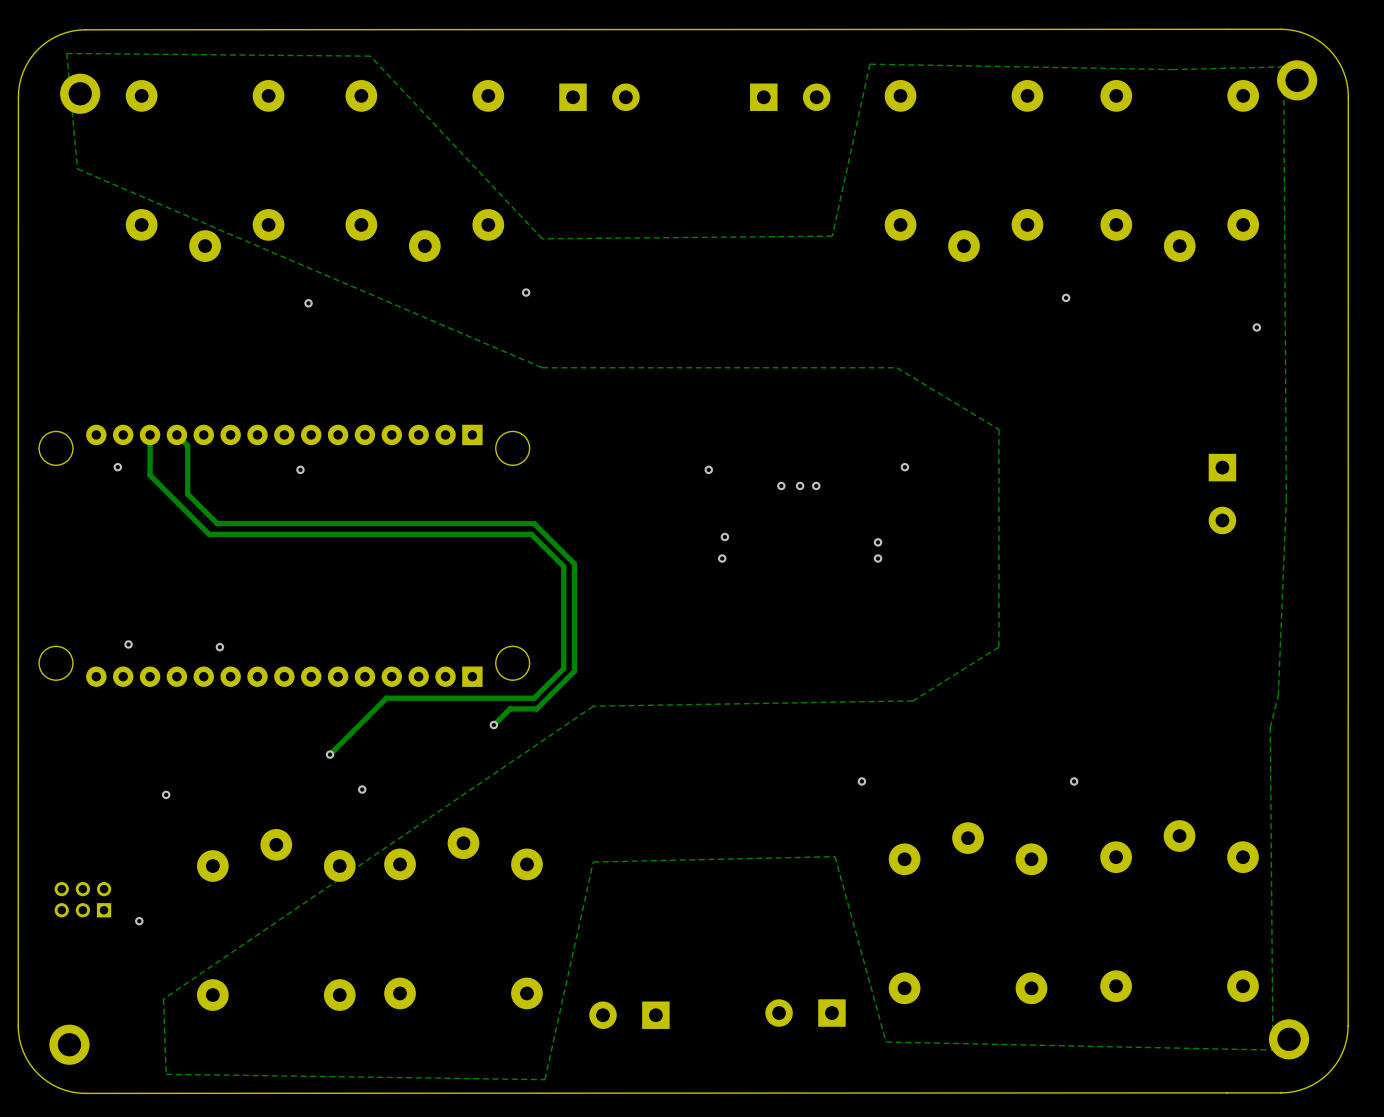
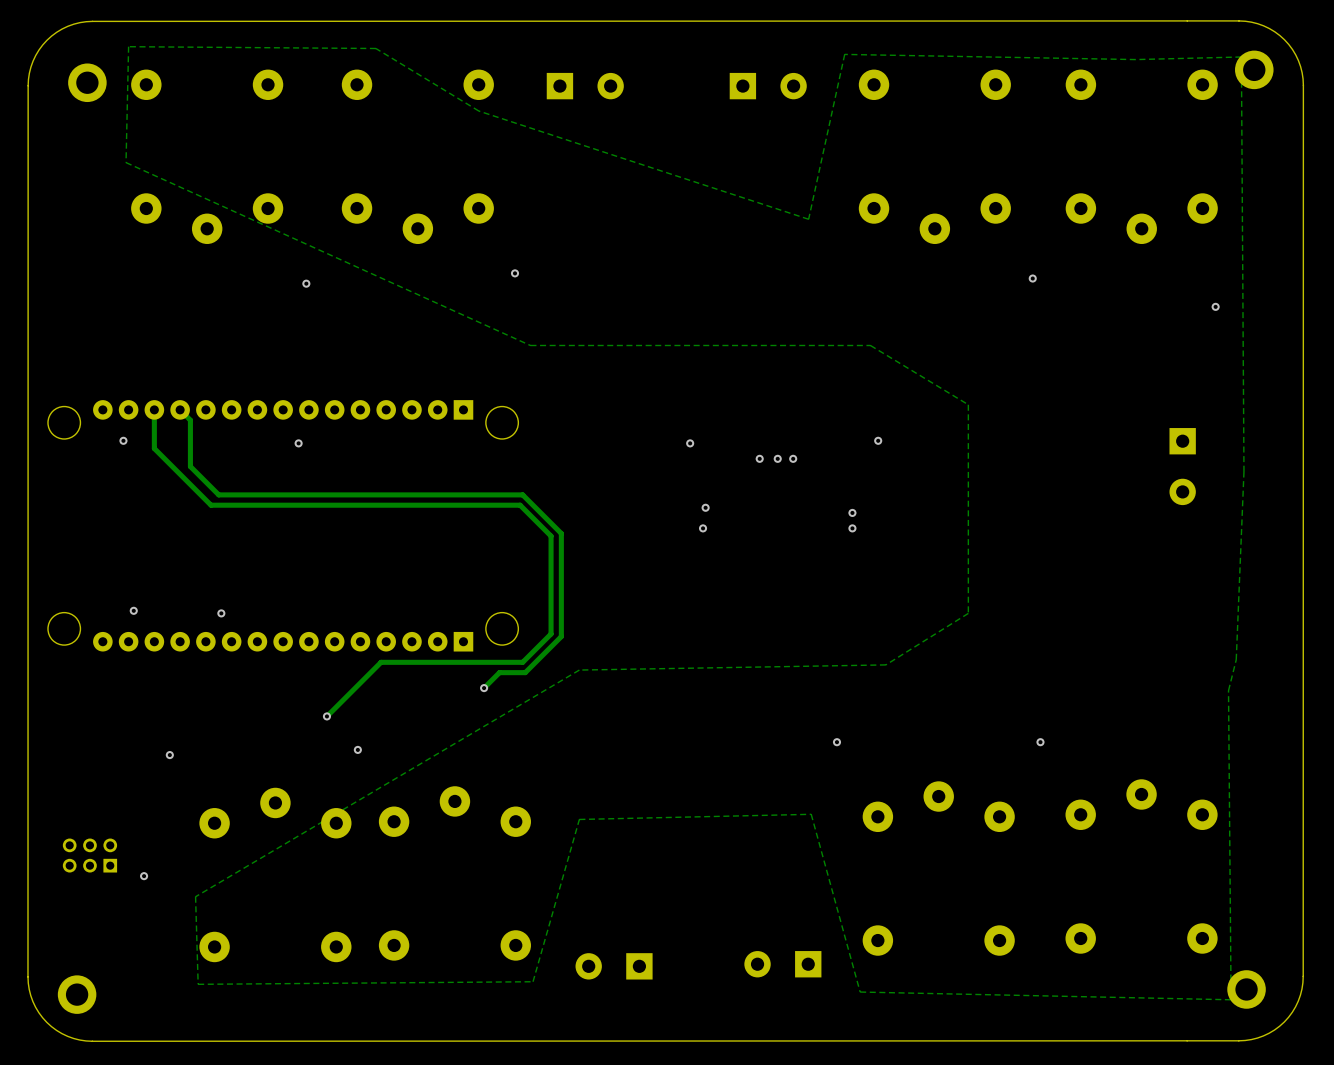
zone outline: (832, 236) (542, 238) (370, 56) (66, 53) (77, 168) (542, 367) -> (808, 219) (478, 111) (375, 48) (128, 46) (126, 162) (530, 345)
zone outline: (593, 706) (163, 999) (166, 1074) (544, 1079) (593, 862) -> (579, 670) (195, 896) (198, 984) (533, 981) (579, 819)

